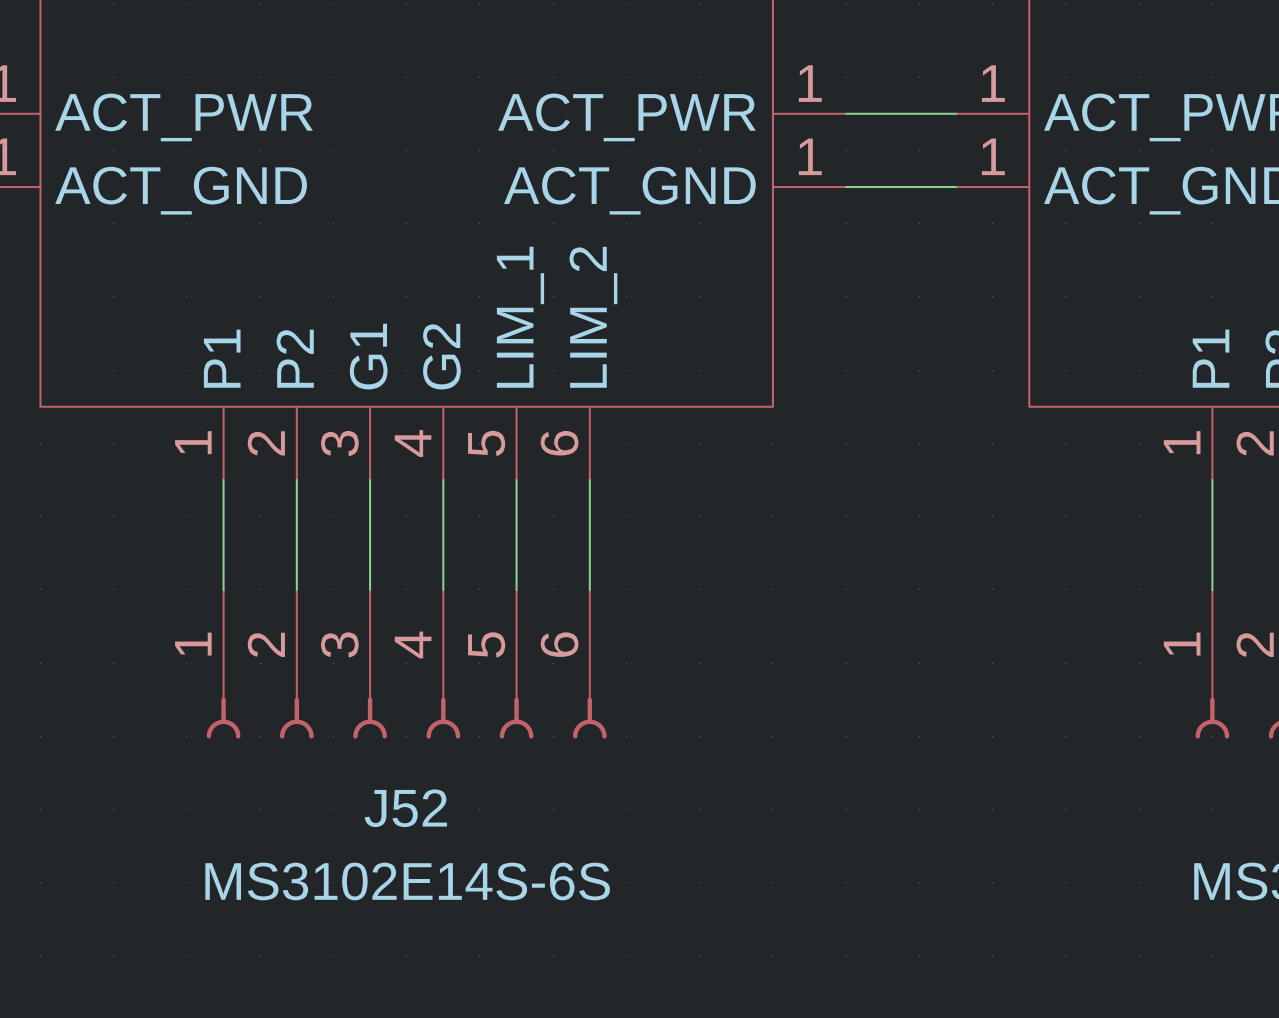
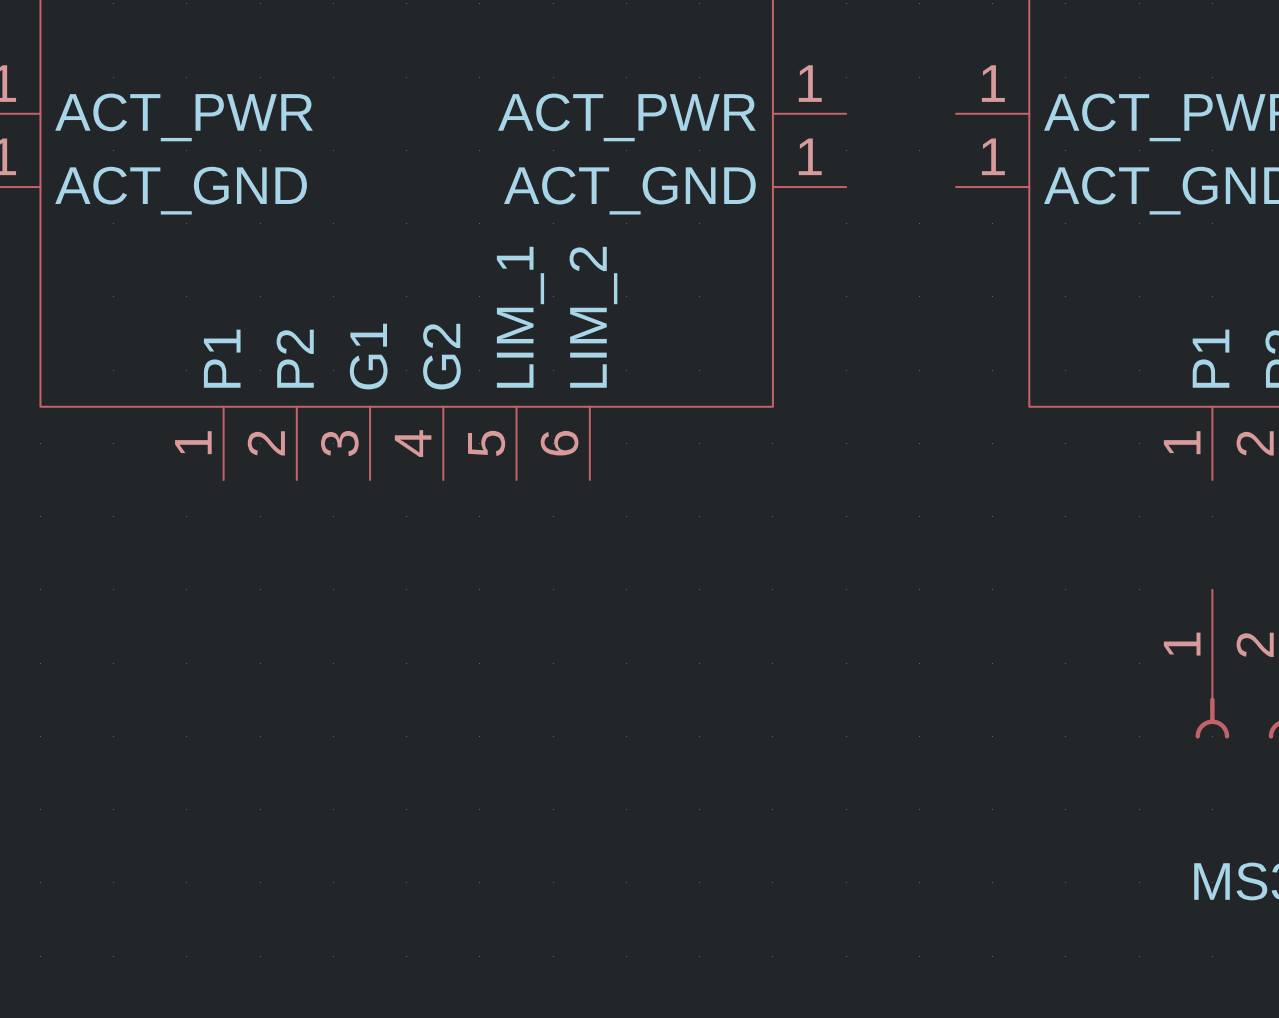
wire: (846, 113) (956, 113) -> none
wire: (846, 187) (956, 187) -> none
wire: (223, 480) (223, 589) -> none
wire: (296, 480) (296, 589) -> none
wire: (370, 480) (370, 589) -> none
wire: (443, 480) (443, 589) -> none
wire: (516, 480) (516, 589) -> none
wire: (589, 480) (589, 589) -> none
wire: (1212, 480) (1212, 589) -> none
J52: MS3102E14S-6S (406, 664) -> none

